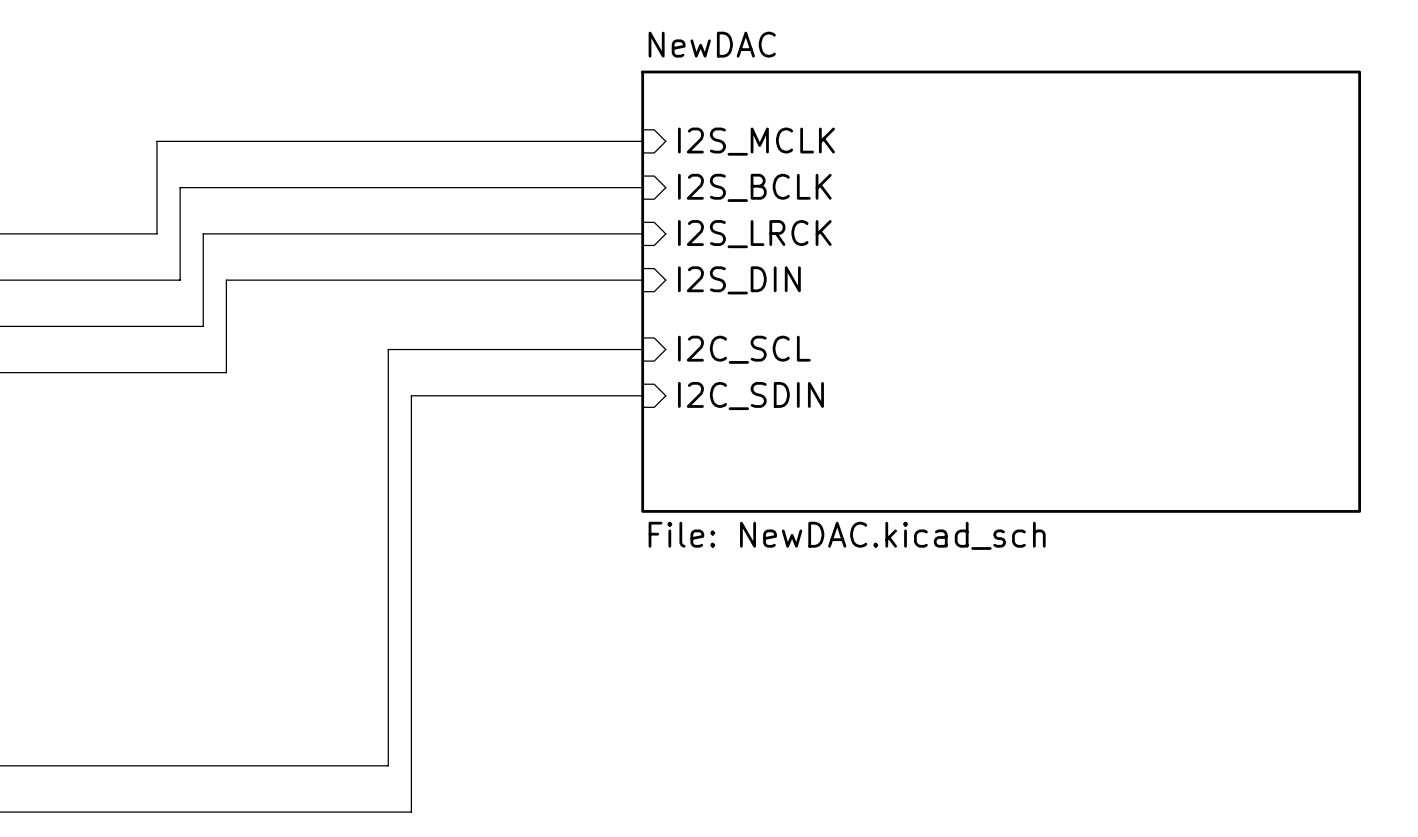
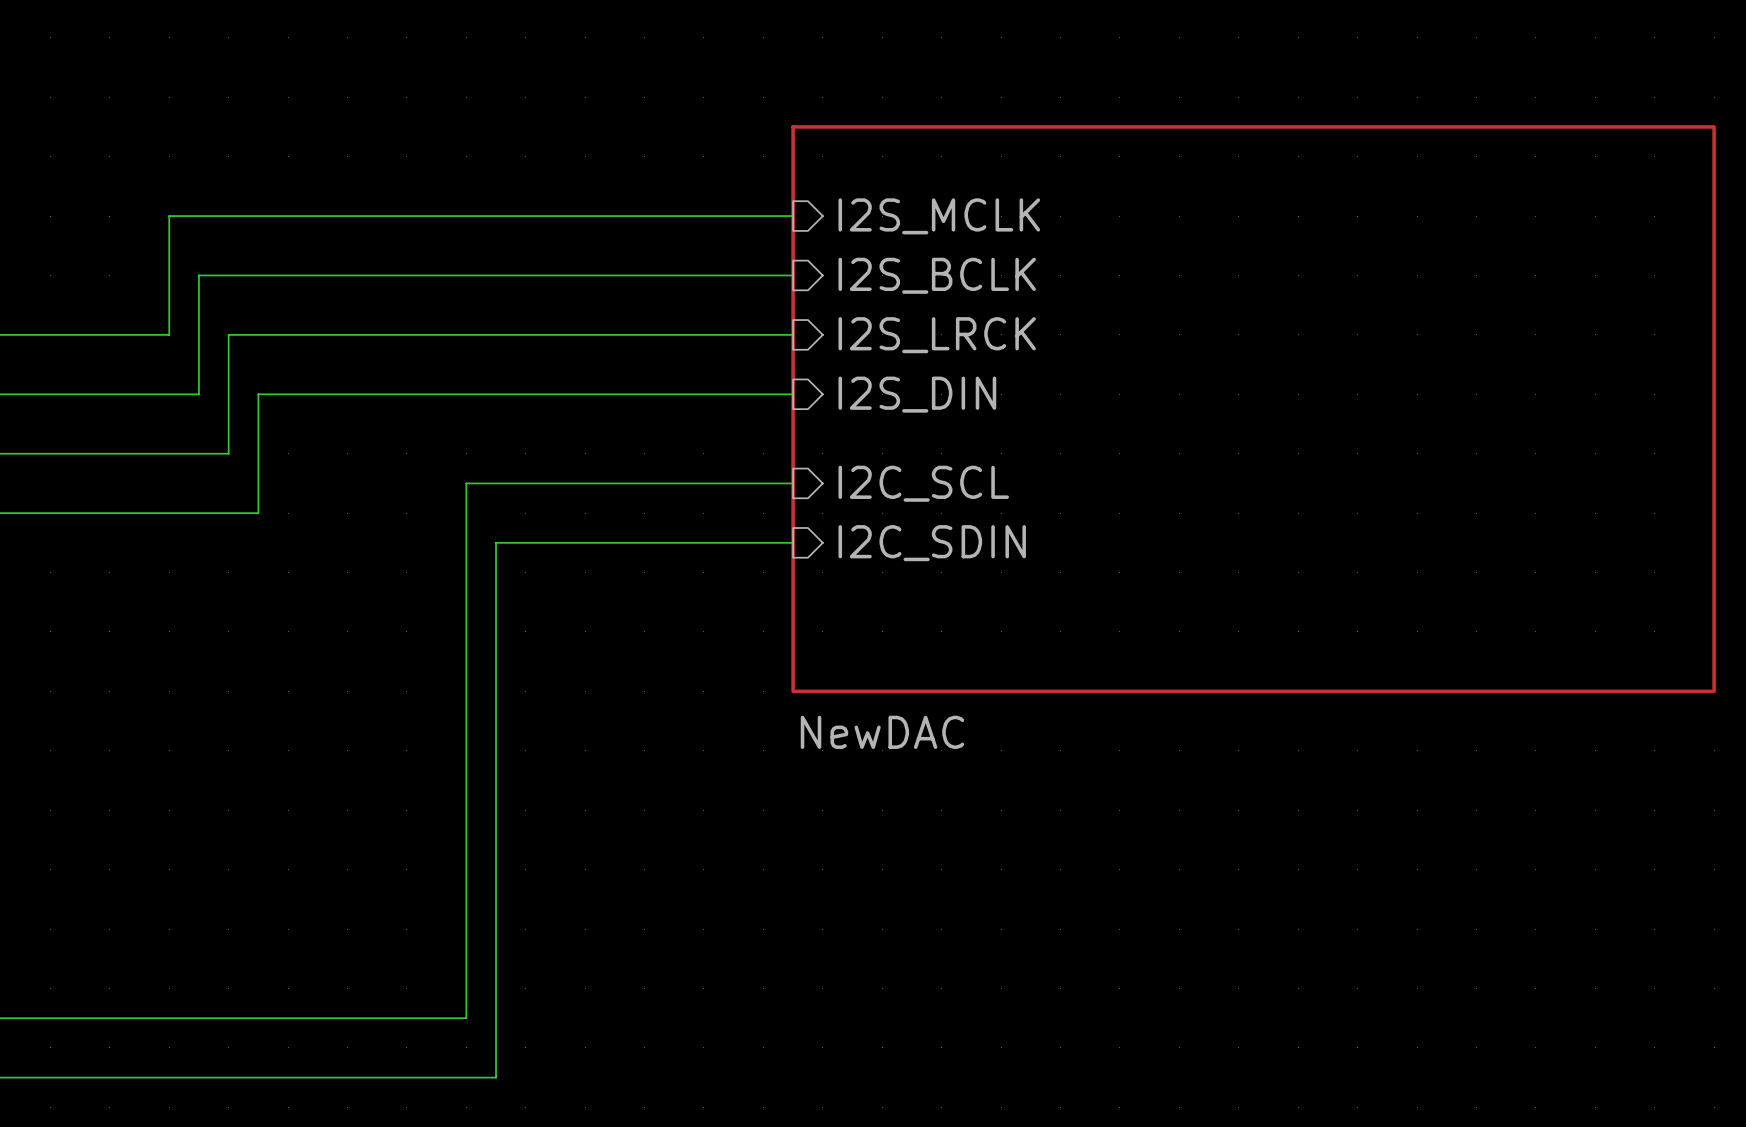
sheet NewDAC name position: NewDAC (712, 44) -> NewDAC (882, 732)
sheet NewDAC value: File: NewDAC.kicad_sch (847, 535) -> none

